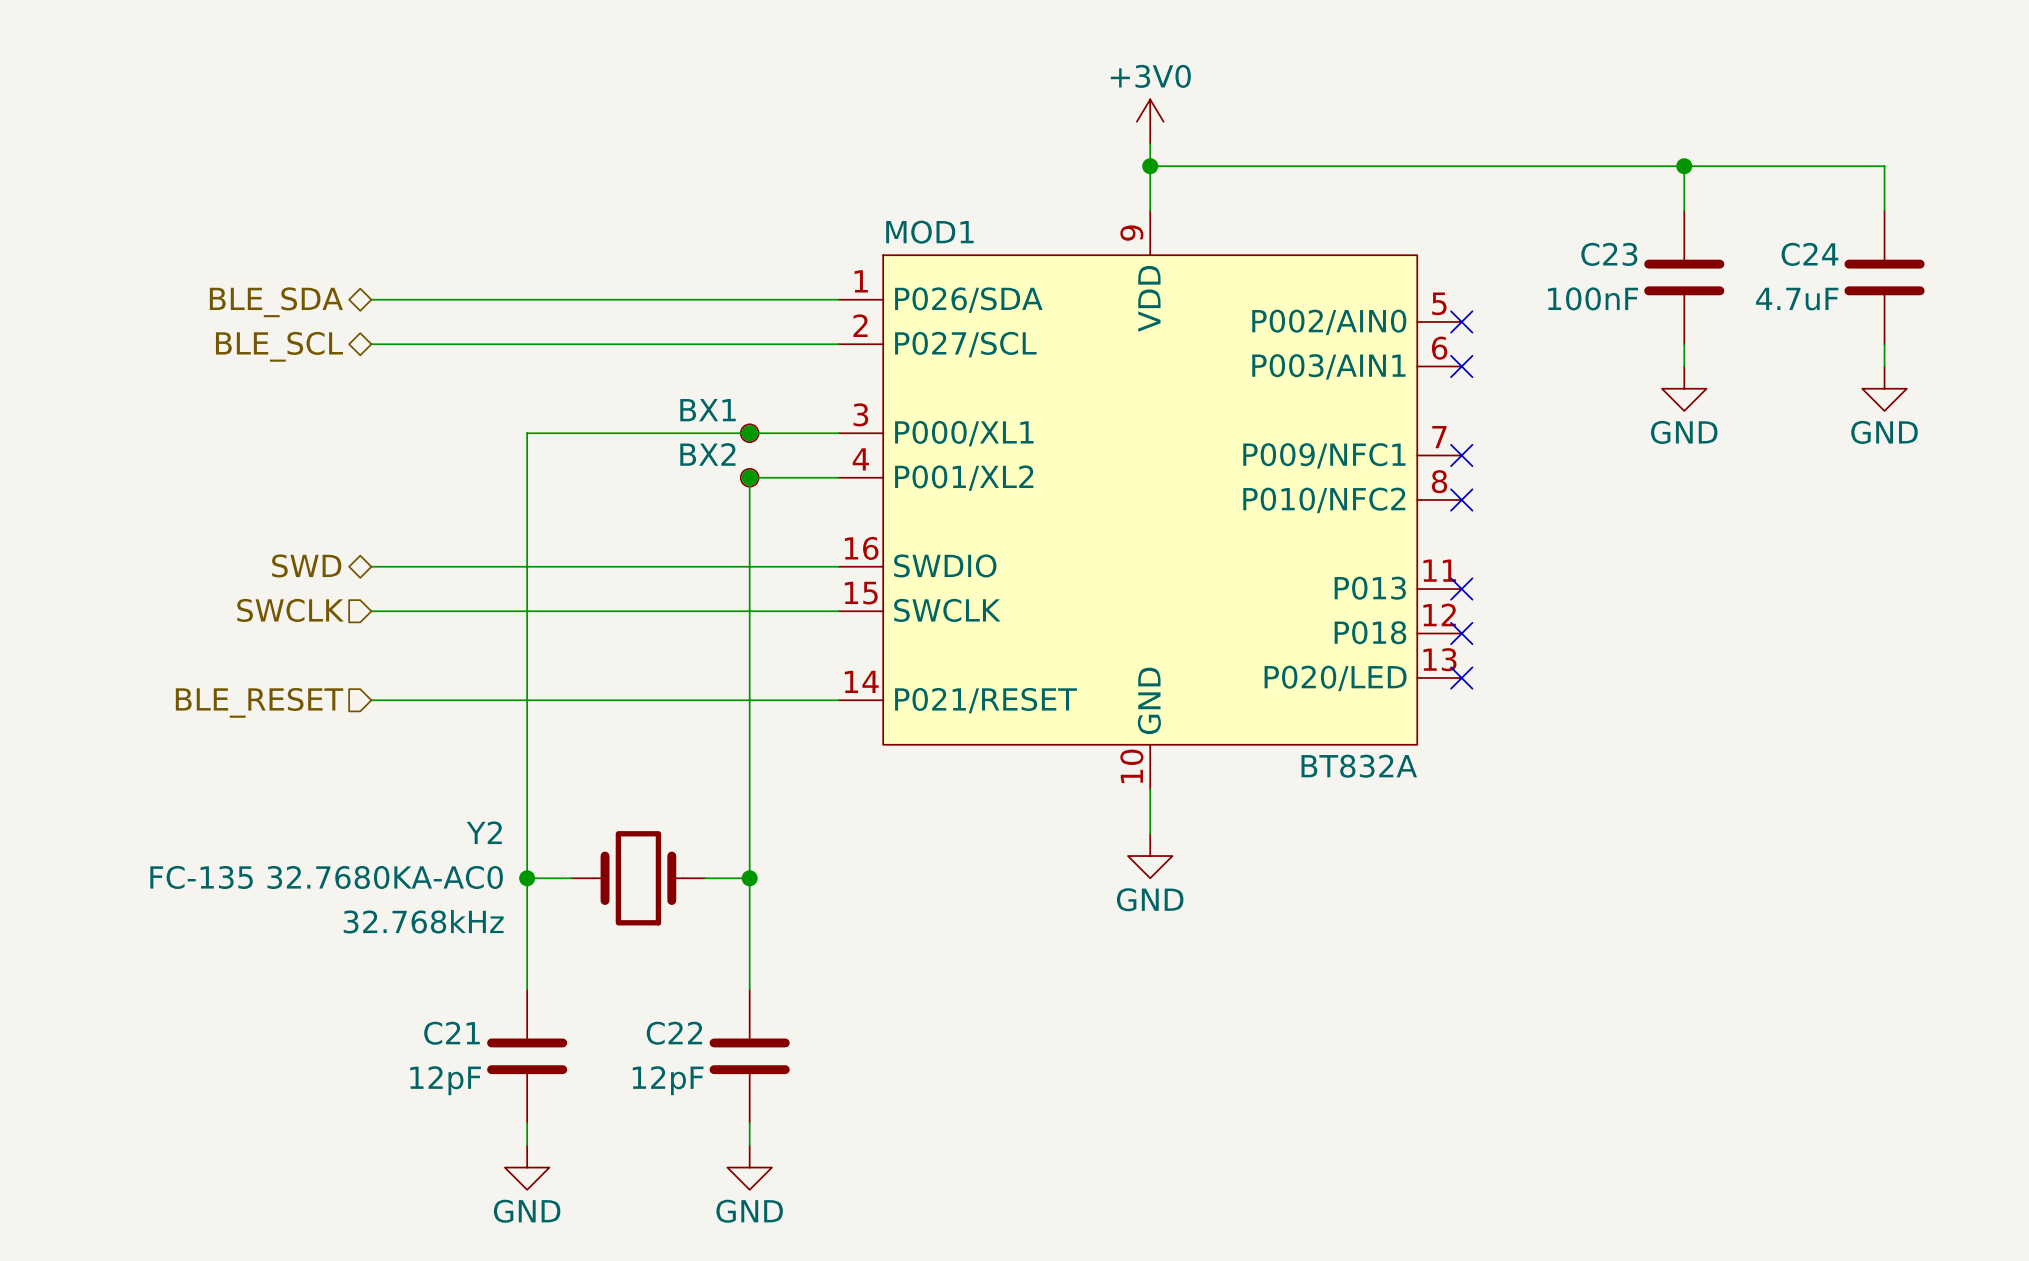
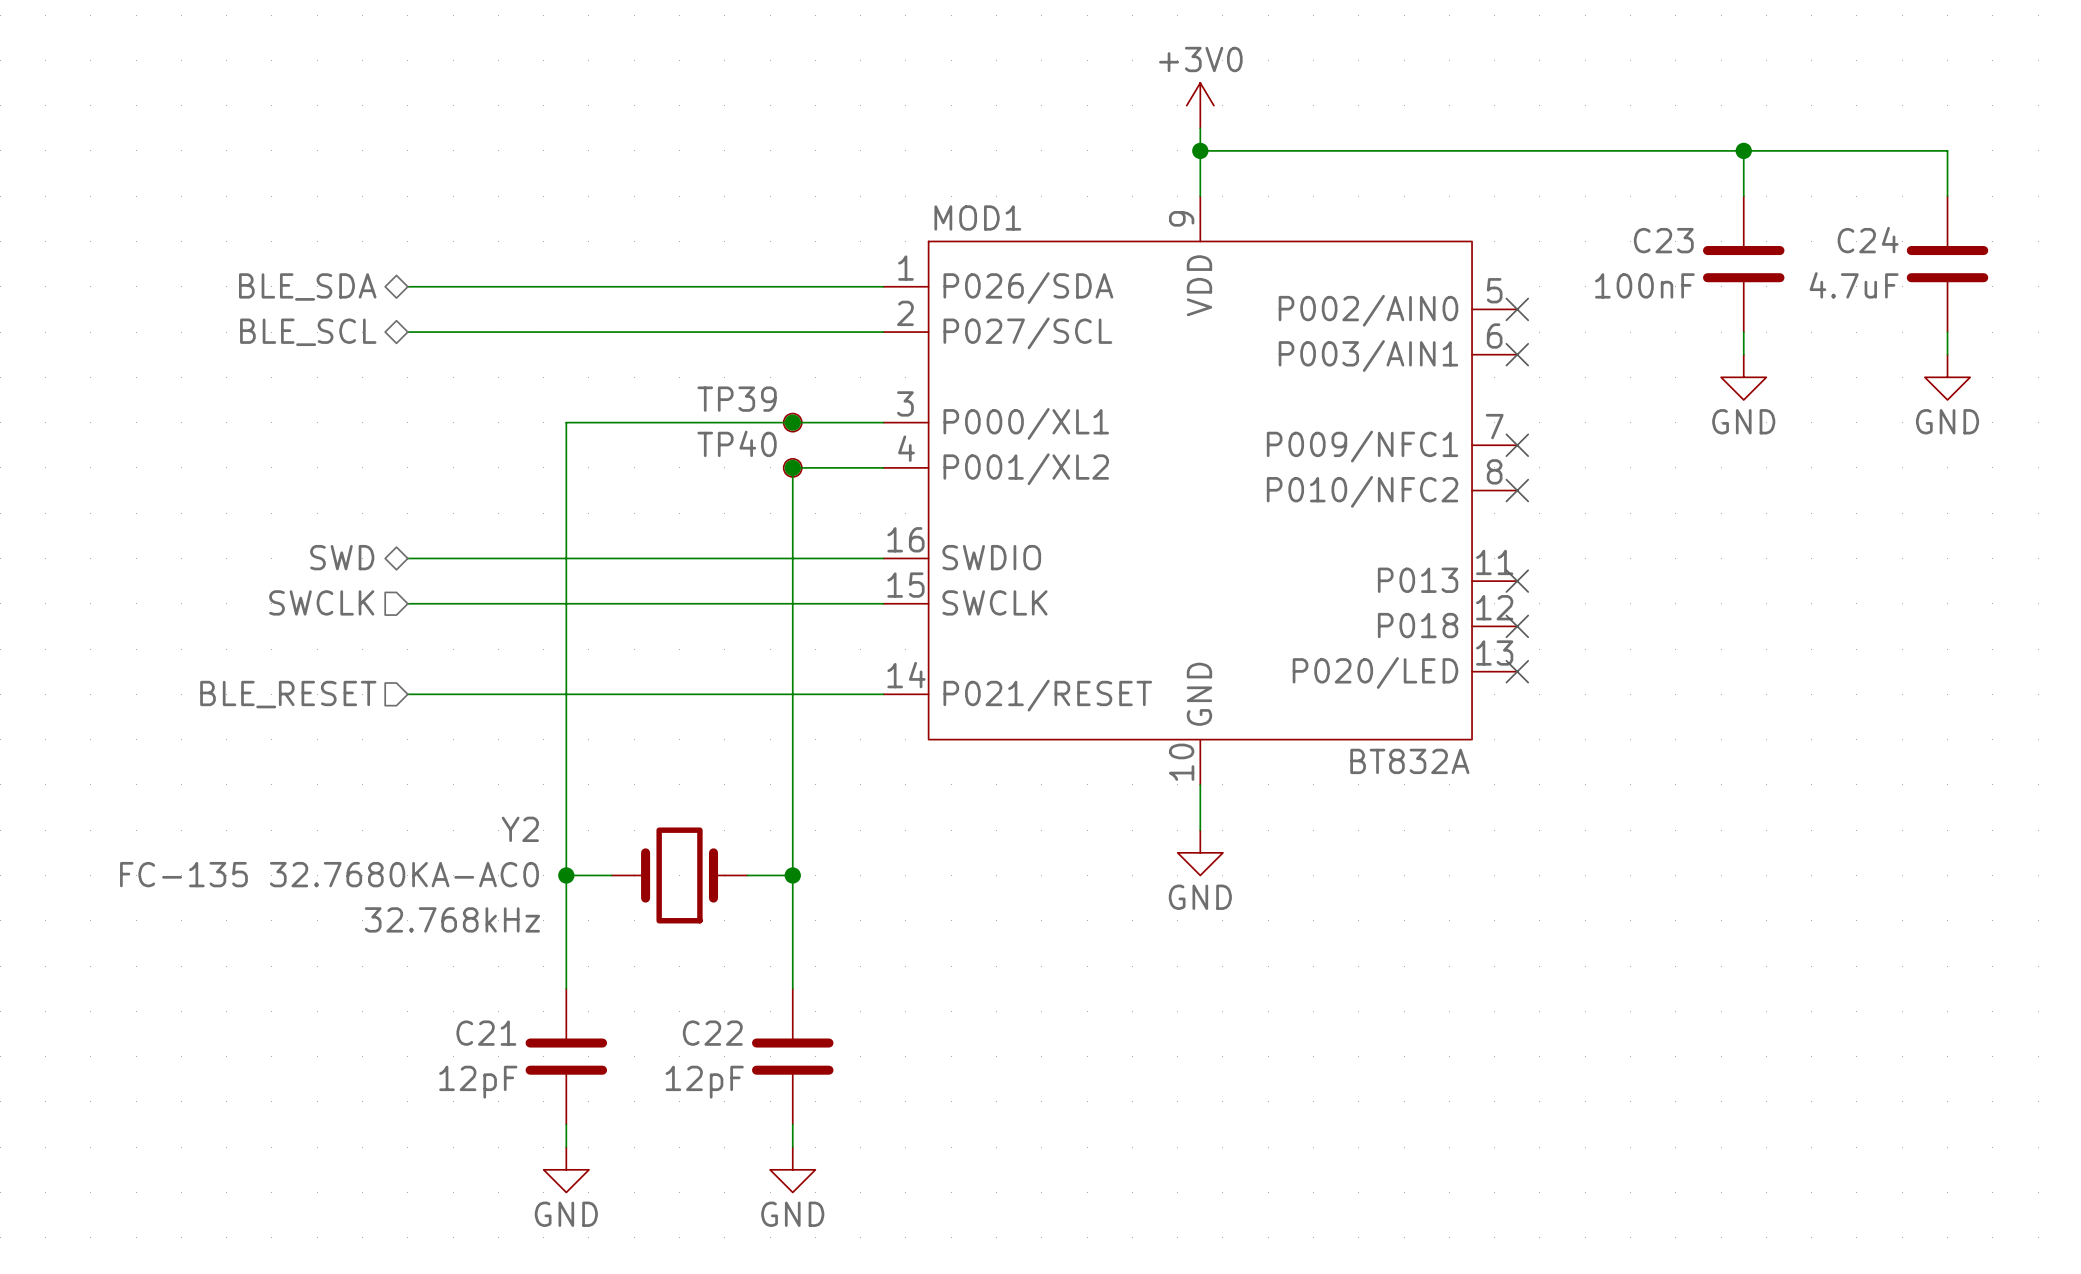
TP39 name: none -> TP39 (737, 399)
TP39 value: BX1 (708, 410) -> none
TP40 name: none -> TP40 (737, 443)
TP40 value: BX2 (707, 454) -> none

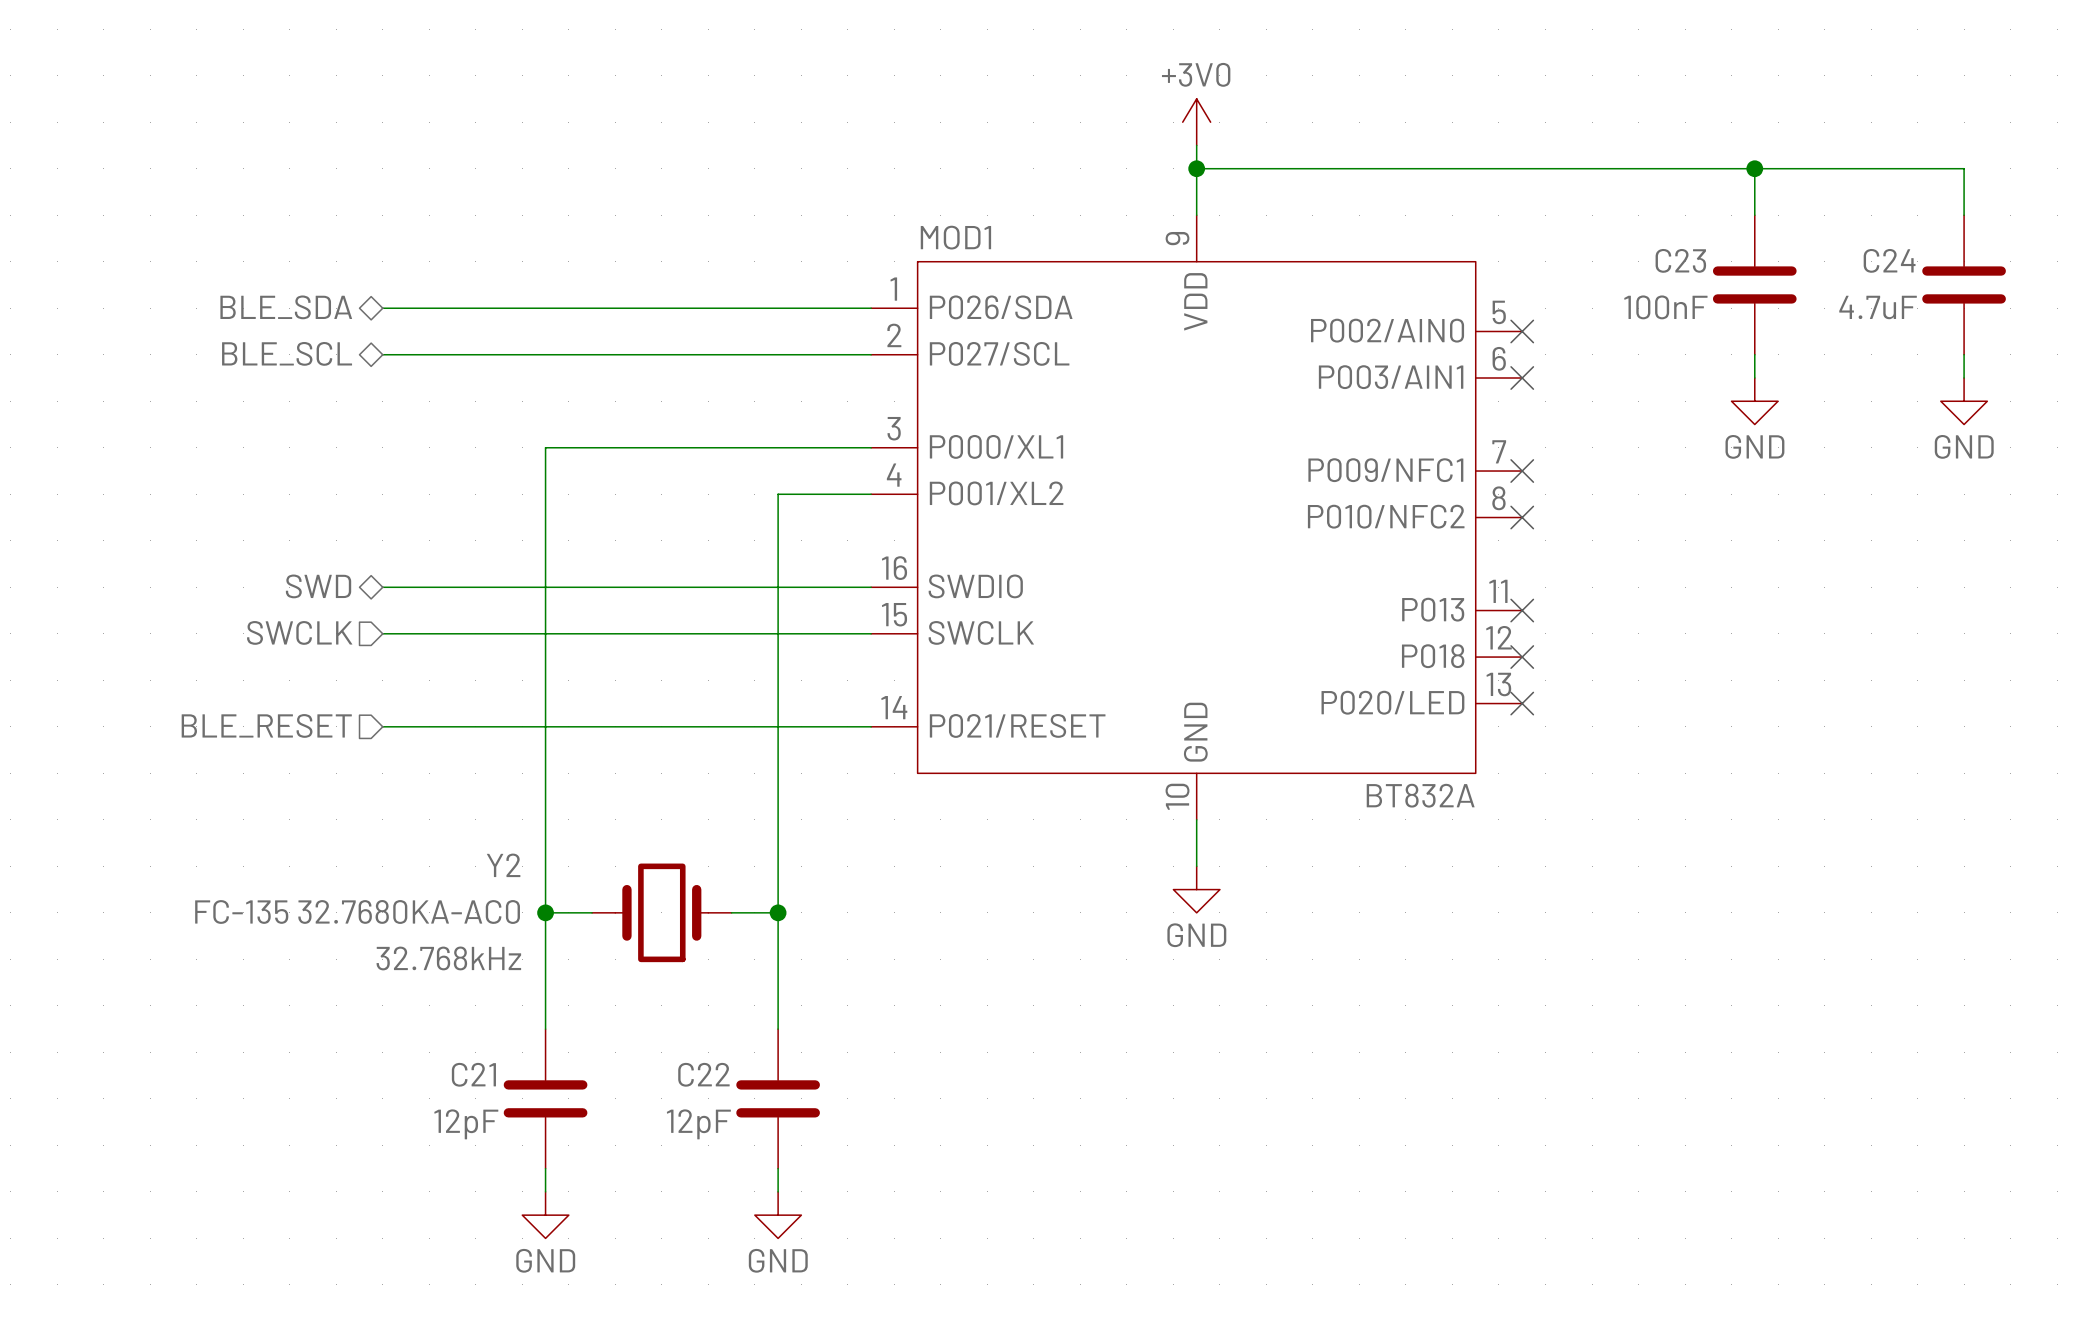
junction: (792, 422) -> none
TP39: (792, 422) -> none
junction: (792, 467) -> none
TP40: (792, 467) -> none

